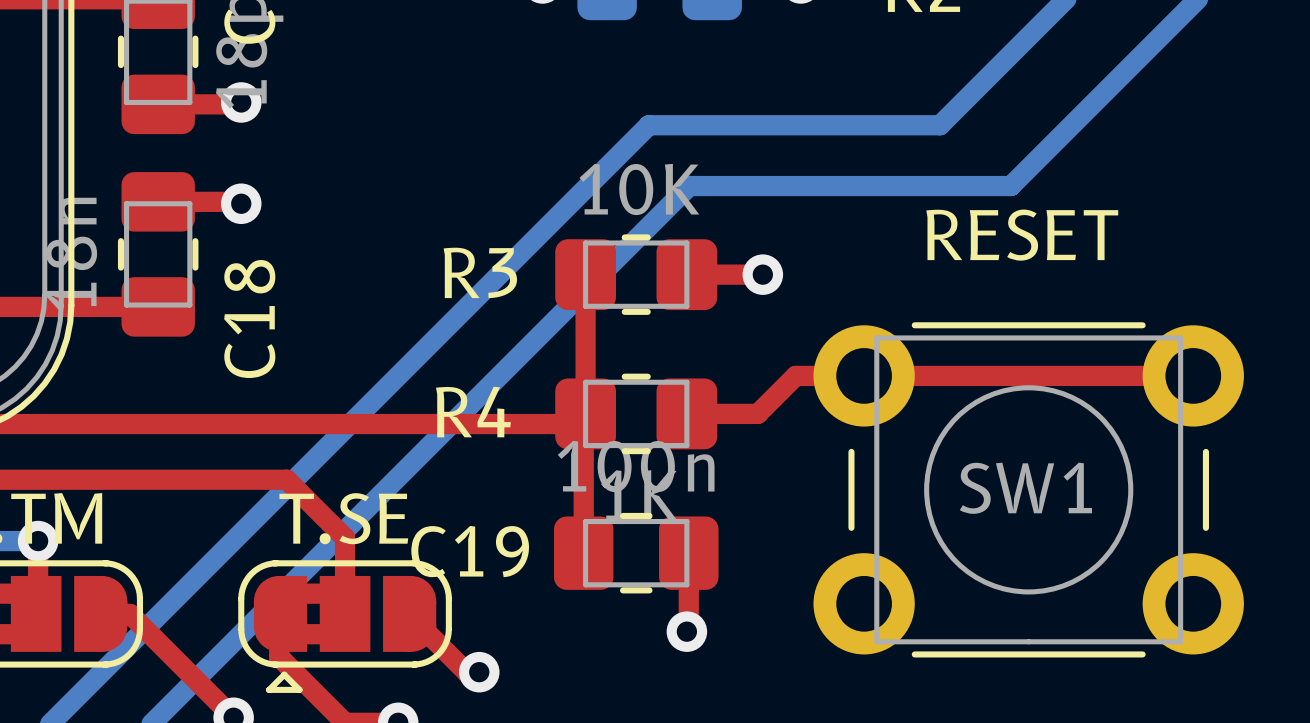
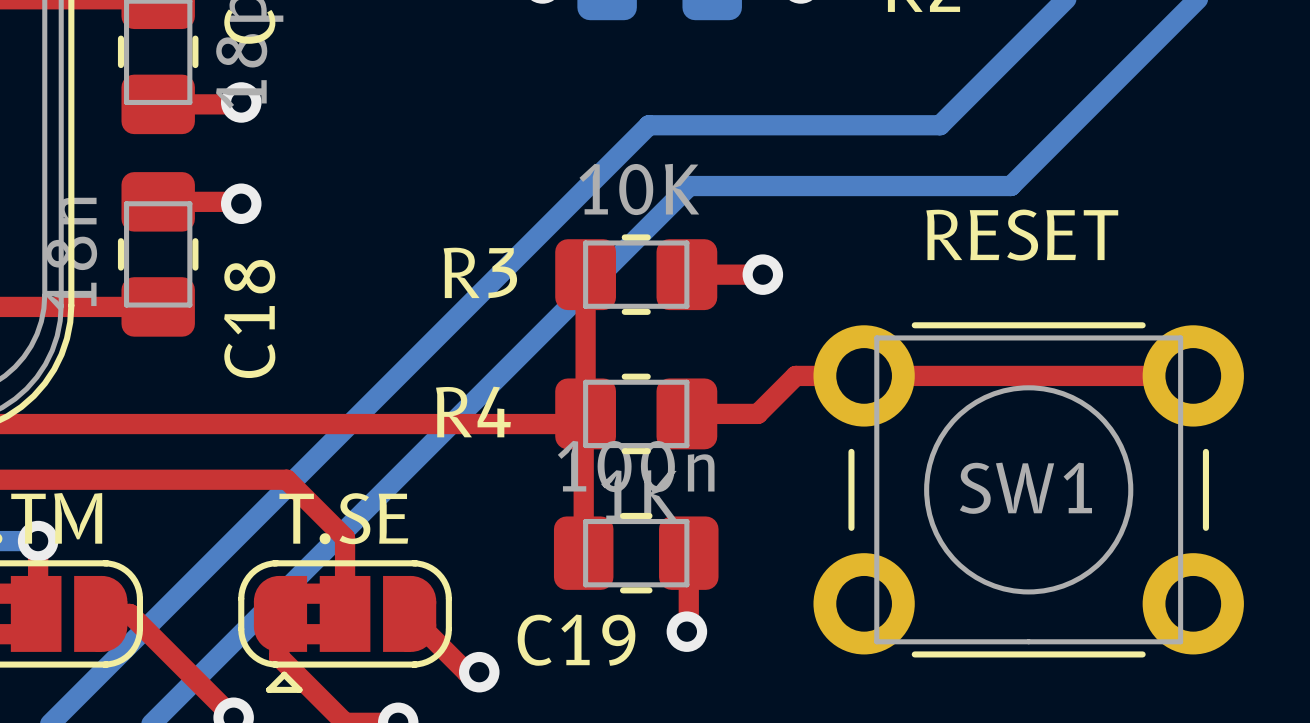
C19 name position: C19 (470, 551) -> C19 (576, 640)

